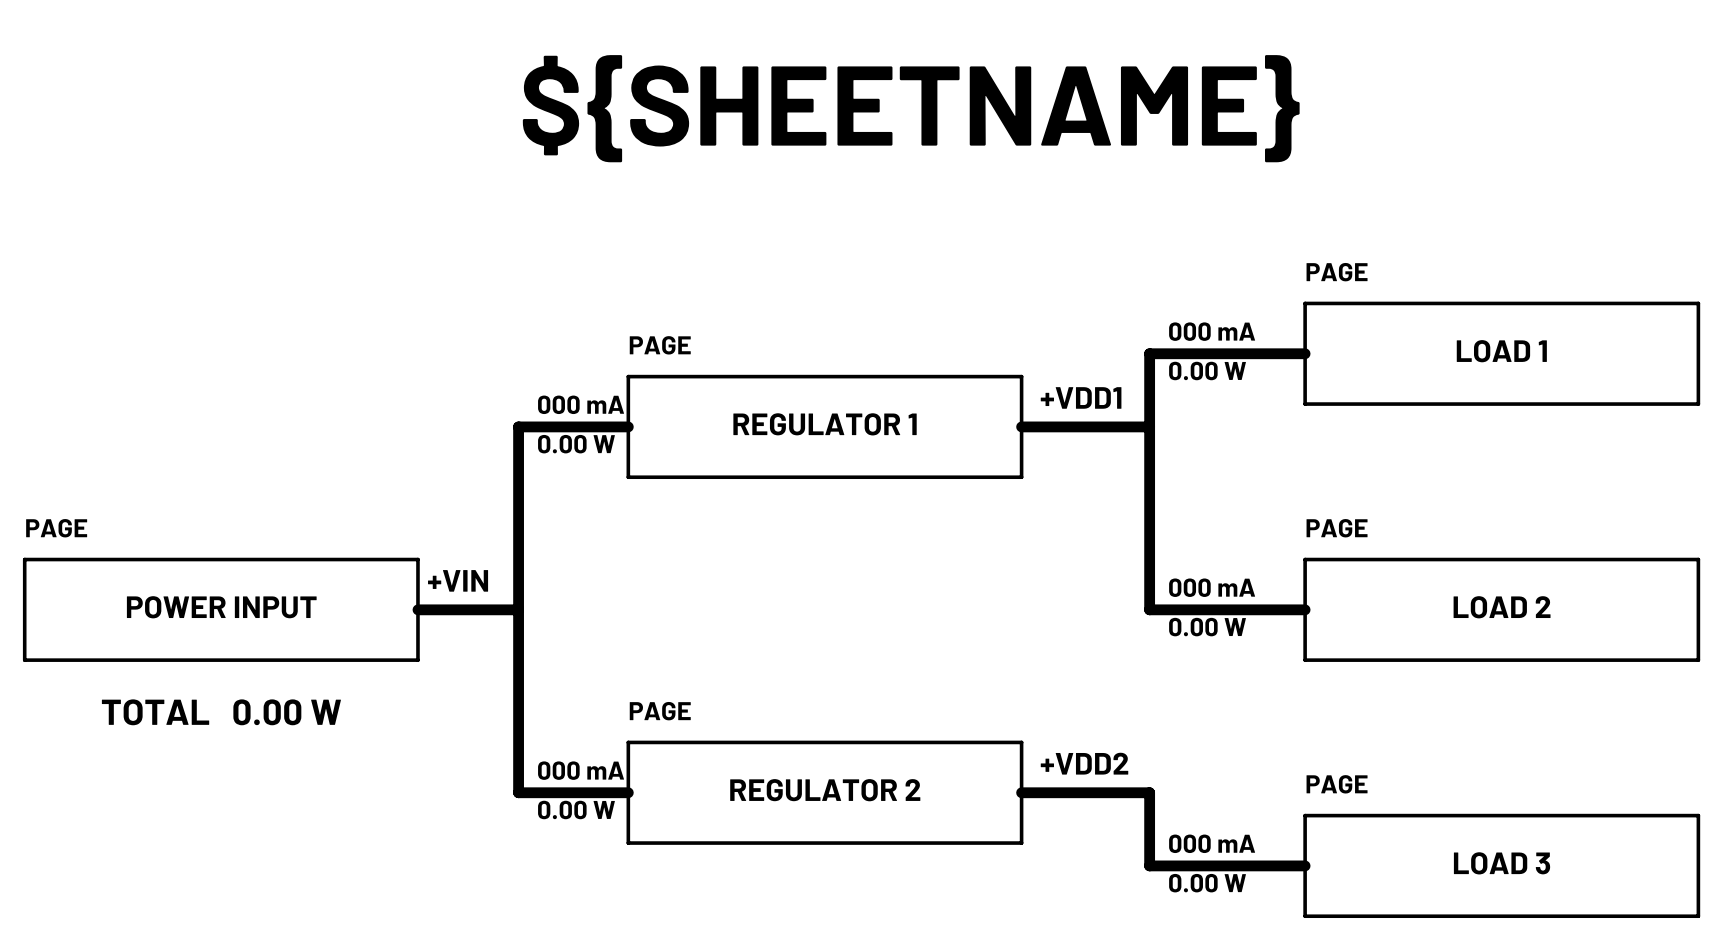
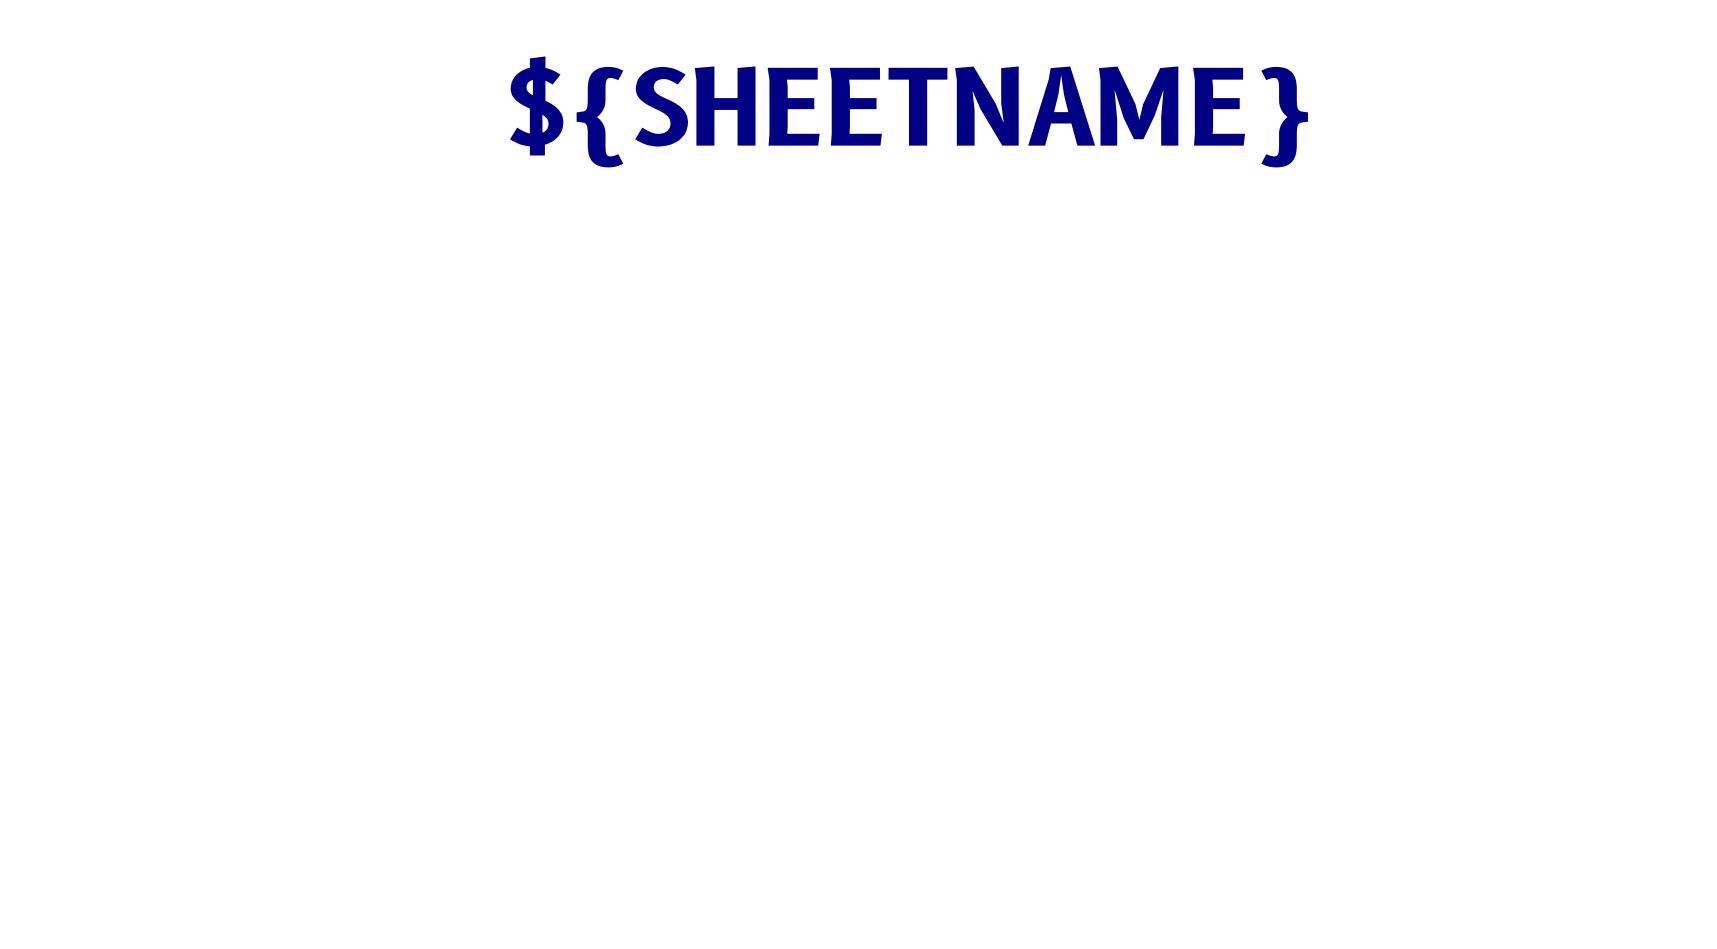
text: PAGE (1337, 272) -> none
line: (1305, 303) (1698, 303) (1698, 404) (1305, 404) (1305, 303) -> none
text: 000 mA (1212, 331) -> none
text: PAGE (660, 345) -> none
text: LOAD 1 (1501, 351) -> none
line: (1305, 353) (1149, 353) (1149, 609) (1305, 609) -> none
text: 0.00 W (1207, 370) -> none
line: (628, 376) (1021, 376) (1021, 477) (628, 477) (628, 376) -> none
text: +VDD1 (1081, 397) -> none
text: 000 mA (581, 404) -> none
text: REGULATOR 1 (825, 424) -> none
line: (628, 426) (518, 426) (518, 792) (628, 792) -> none
line: (1021, 426) (1149, 426) -> none
text: 0.00 W (576, 444) -> none
text: PAGE (56, 528) -> none
text: PAGE (1337, 528) -> none
line: (24, 559) (417, 559) (417, 660) (24, 660) (24, 559) -> none
line: (1305, 559) (1698, 559) (1698, 660) (1305, 660) (1305, 559) -> none
text: +VIN (458, 580) -> none
text: 000 mA (1212, 587) -> none
text: POWER INPUT (221, 607) -> none
text: LOAD 2 (1502, 607) -> none
line: (417, 609) (518, 609) -> none
text: 0.00 W (1207, 627) -> none
text: PAGE (660, 711) -> none
text: TOTAL 0.00 W (221, 712) -> none
line: (628, 742) (628, 843) (1021, 843) (1021, 742) (628, 742) -> none
text: +VDD2 (1084, 763) -> none
text: 000 mA (581, 770) -> none
text: PAGE (1337, 784) -> none
text: REGULATOR 2 (825, 790) -> none
line: (1021, 792) (1149, 792) (1149, 865) (1305, 865) -> none
text: 0.00 W (576, 809) -> none
line: (1305, 815) (1305, 916) (1698, 916) (1698, 815) (1305, 815) -> none
text: 000 mA (1212, 843) -> none
text: LOAD 3 (1502, 863) -> none
text: 0.00 W (1207, 883) -> none

